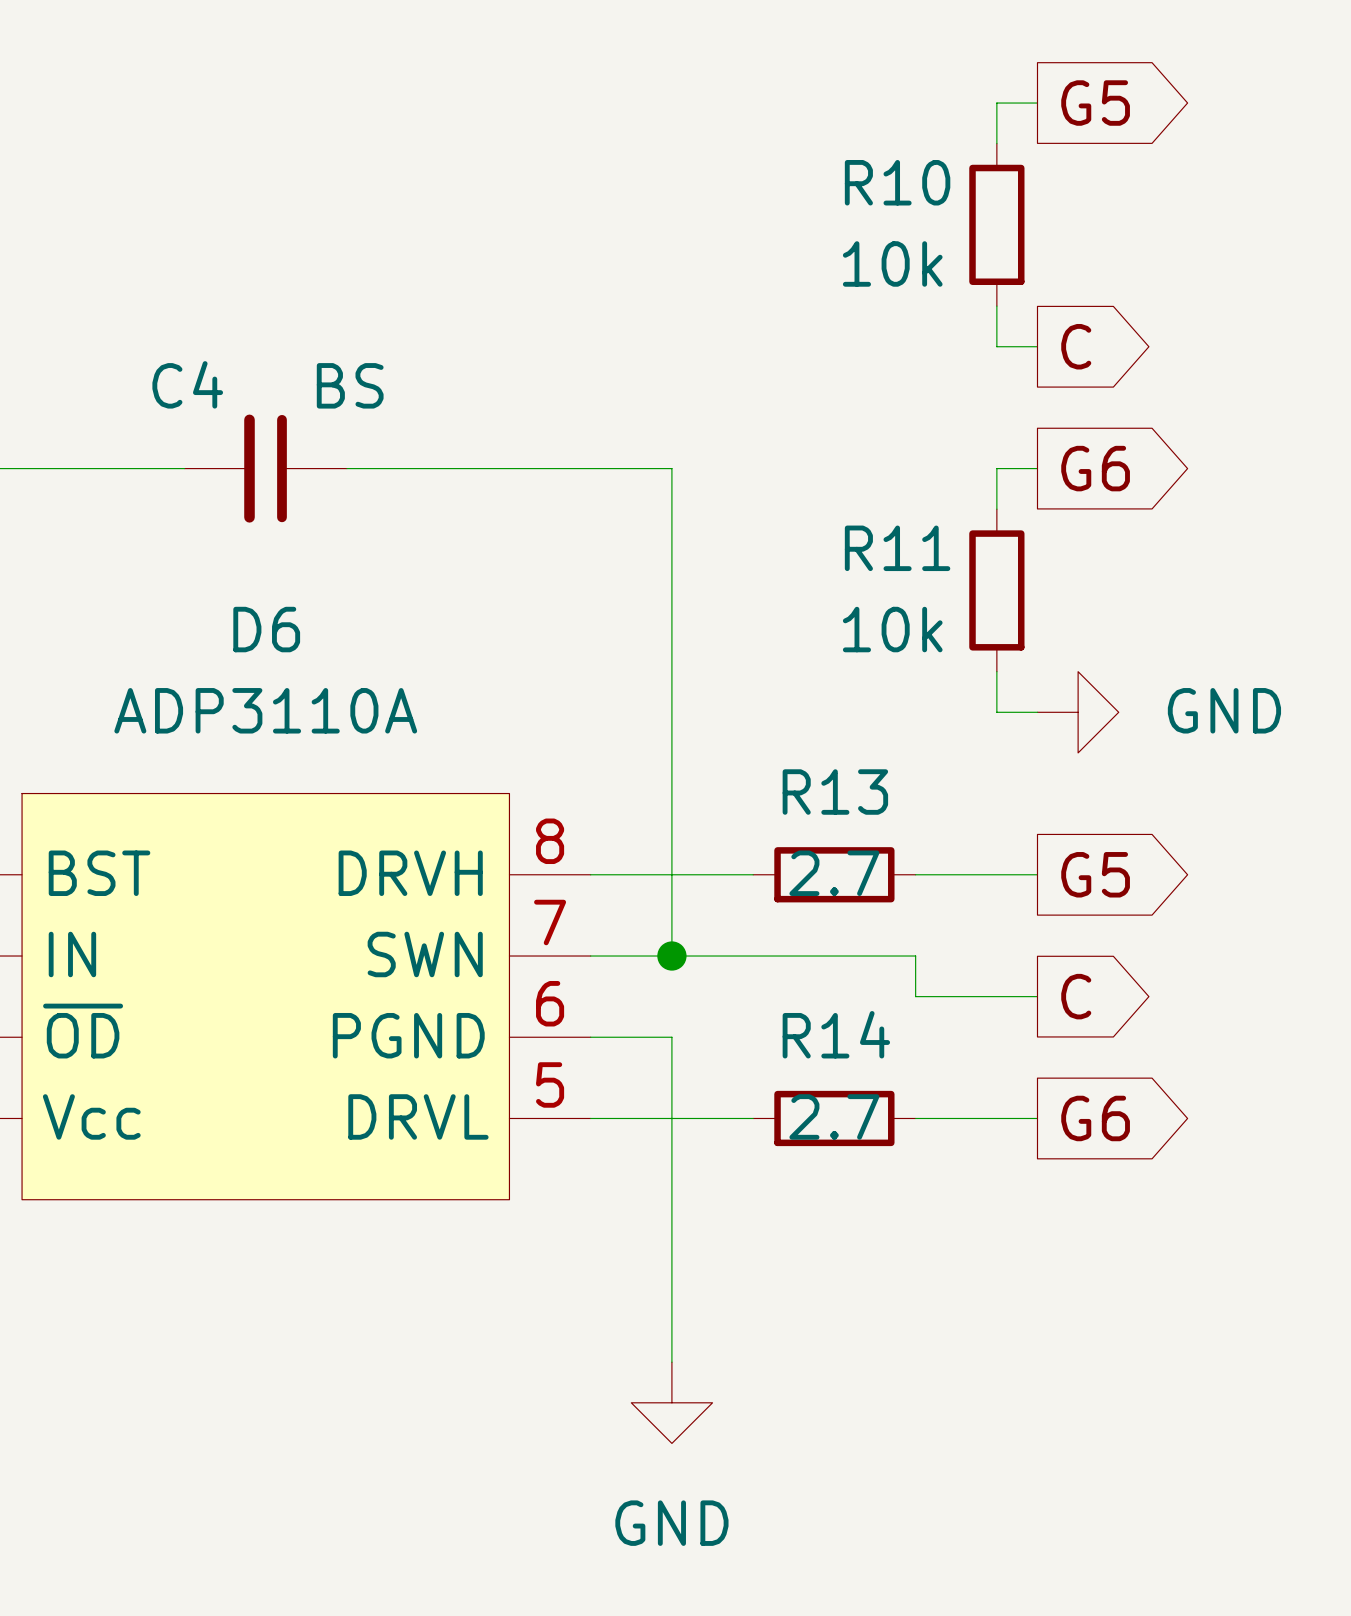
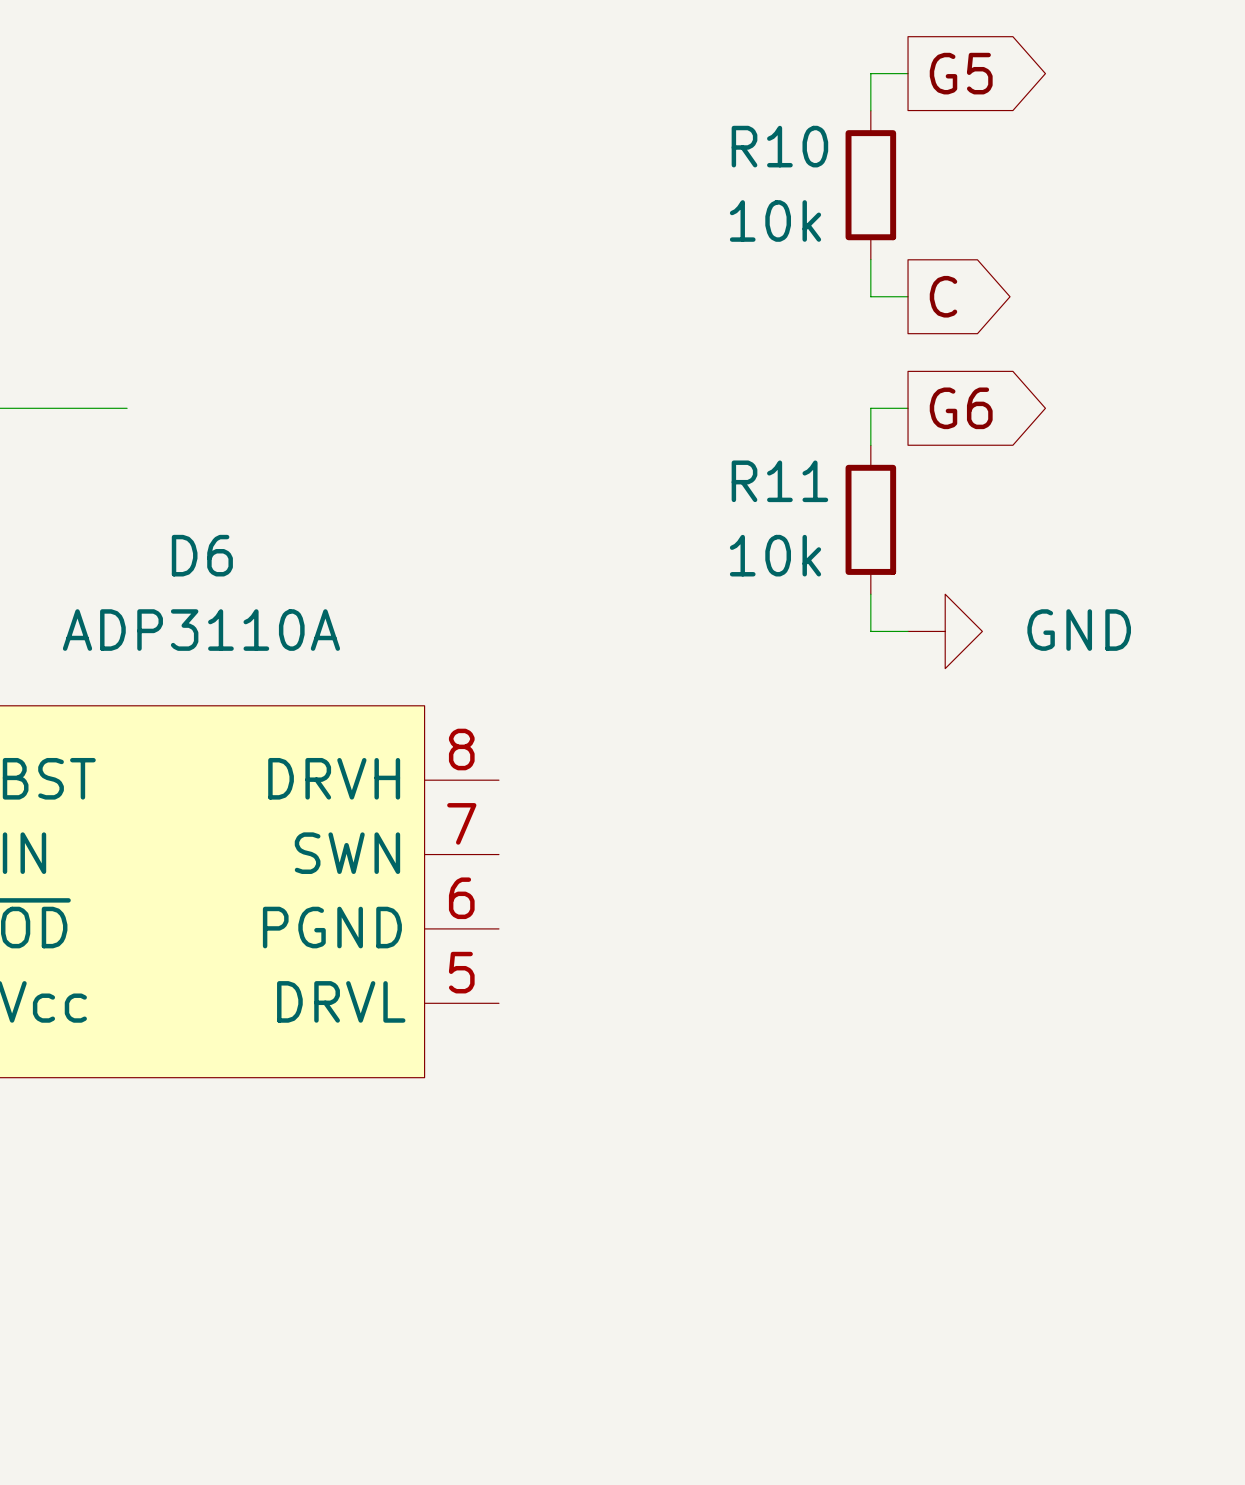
C4: BS (265, 468) -> none
wire: (346, 468) (671, 468) (671, 956) -> none
wire: (590, 874) (753, 874) -> none
R13: 2.7 (834, 874) -> none
wire: (915, 874) (1037, 874) -> none
global label: G5 (1095, 874) -> none
wire: (590, 956) (915, 956) (915, 996) (1037, 996) -> none
junction: (671, 956) -> none
global label: C (1076, 996) -> none
wire: (590, 1037) (671, 1037) (671, 1362) -> none
wire: (590, 1118) (753, 1118) -> none
R14: 2.7 (834, 1118) -> none
wire: (915, 1118) (1037, 1118) -> none
global label: G6 (1095, 1118) -> none
power symbol: GND (671, 1402) -> none

